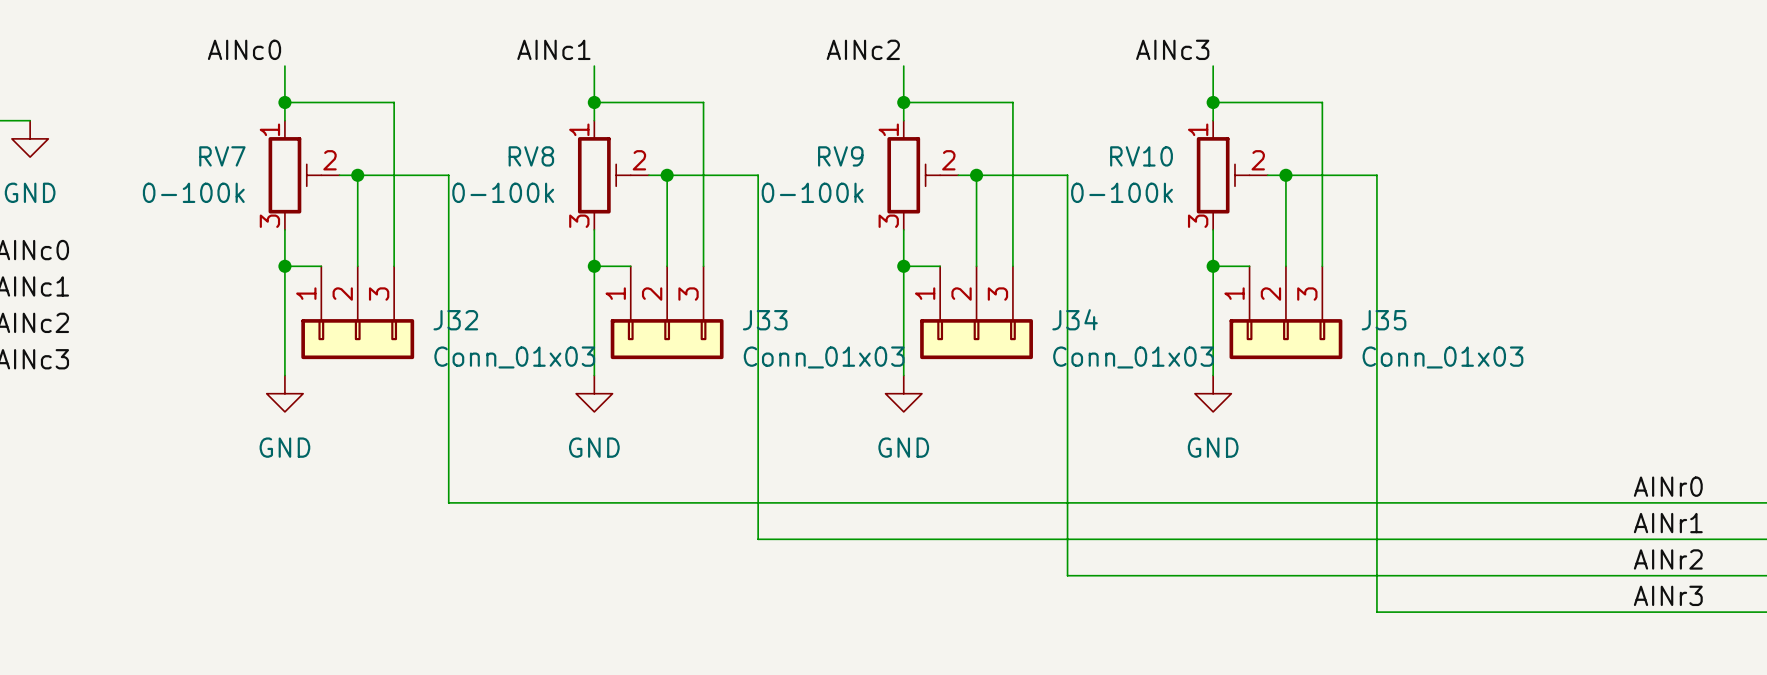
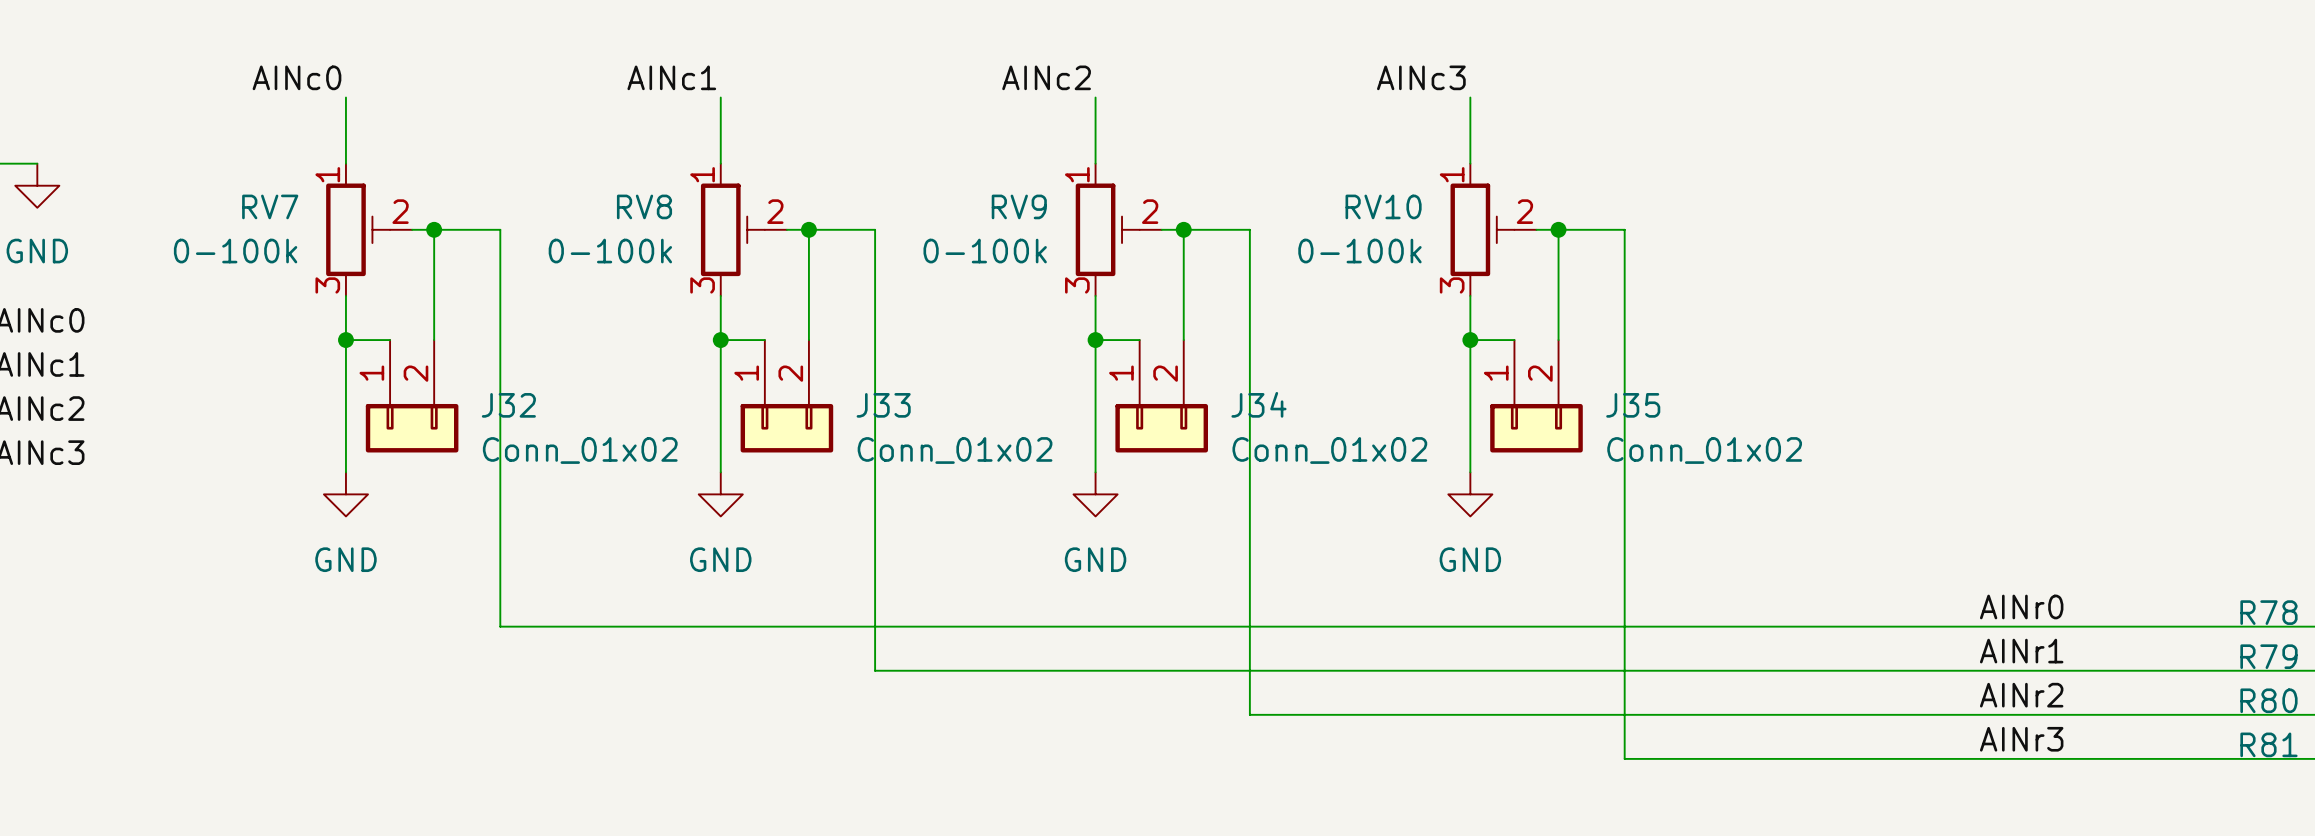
wire: (284, 102) (394, 102) (394, 266) -> none
junction: (284, 102) -> none
wire: (594, 102) (703, 102) (703, 266) -> none
junction: (594, 102) -> none
wire: (903, 102) (1012, 102) (1012, 266) -> none
junction: (903, 102) -> none
wire: (1213, 102) (1322, 102) (1322, 266) -> none
junction: (1213, 102) -> none
wire: (412, 175) (448, 175) (448, 502) -> (500, 229) (500, 626) (544, 626)
wire: (721, 175) (758, 175) (758, 539) -> (875, 229) (875, 670) (919, 670)
wire: (1031, 175) (1067, 175) (1067, 575) -> (1249, 229) (1249, 714) (1293, 714)
wire: (1340, 175) (1376, 175) (1376, 612) -> (1624, 229) (1624, 758) (1668, 758)
J32 symbol: [301, 266, 415, 360] -> [365, 340, 459, 453]
J33 symbol: [610, 266, 724, 360] -> [740, 340, 834, 453]
J34 symbol: [920, 266, 1033, 360] -> [1115, 340, 1209, 453]
J35 symbol: [1229, 266, 1343, 360] -> [1490, 340, 1583, 453]
J32 value: Conn_01x03 (514, 357) -> Conn_01x02 (580, 450)
J33 value: Conn_01x03 (824, 357) -> Conn_01x02 (955, 450)
J34 value: Conn_01x03 (1133, 357) -> Conn_01x02 (1329, 450)
J35 value: Conn_01x03 (1442, 357) -> Conn_01x02 (1704, 450)

